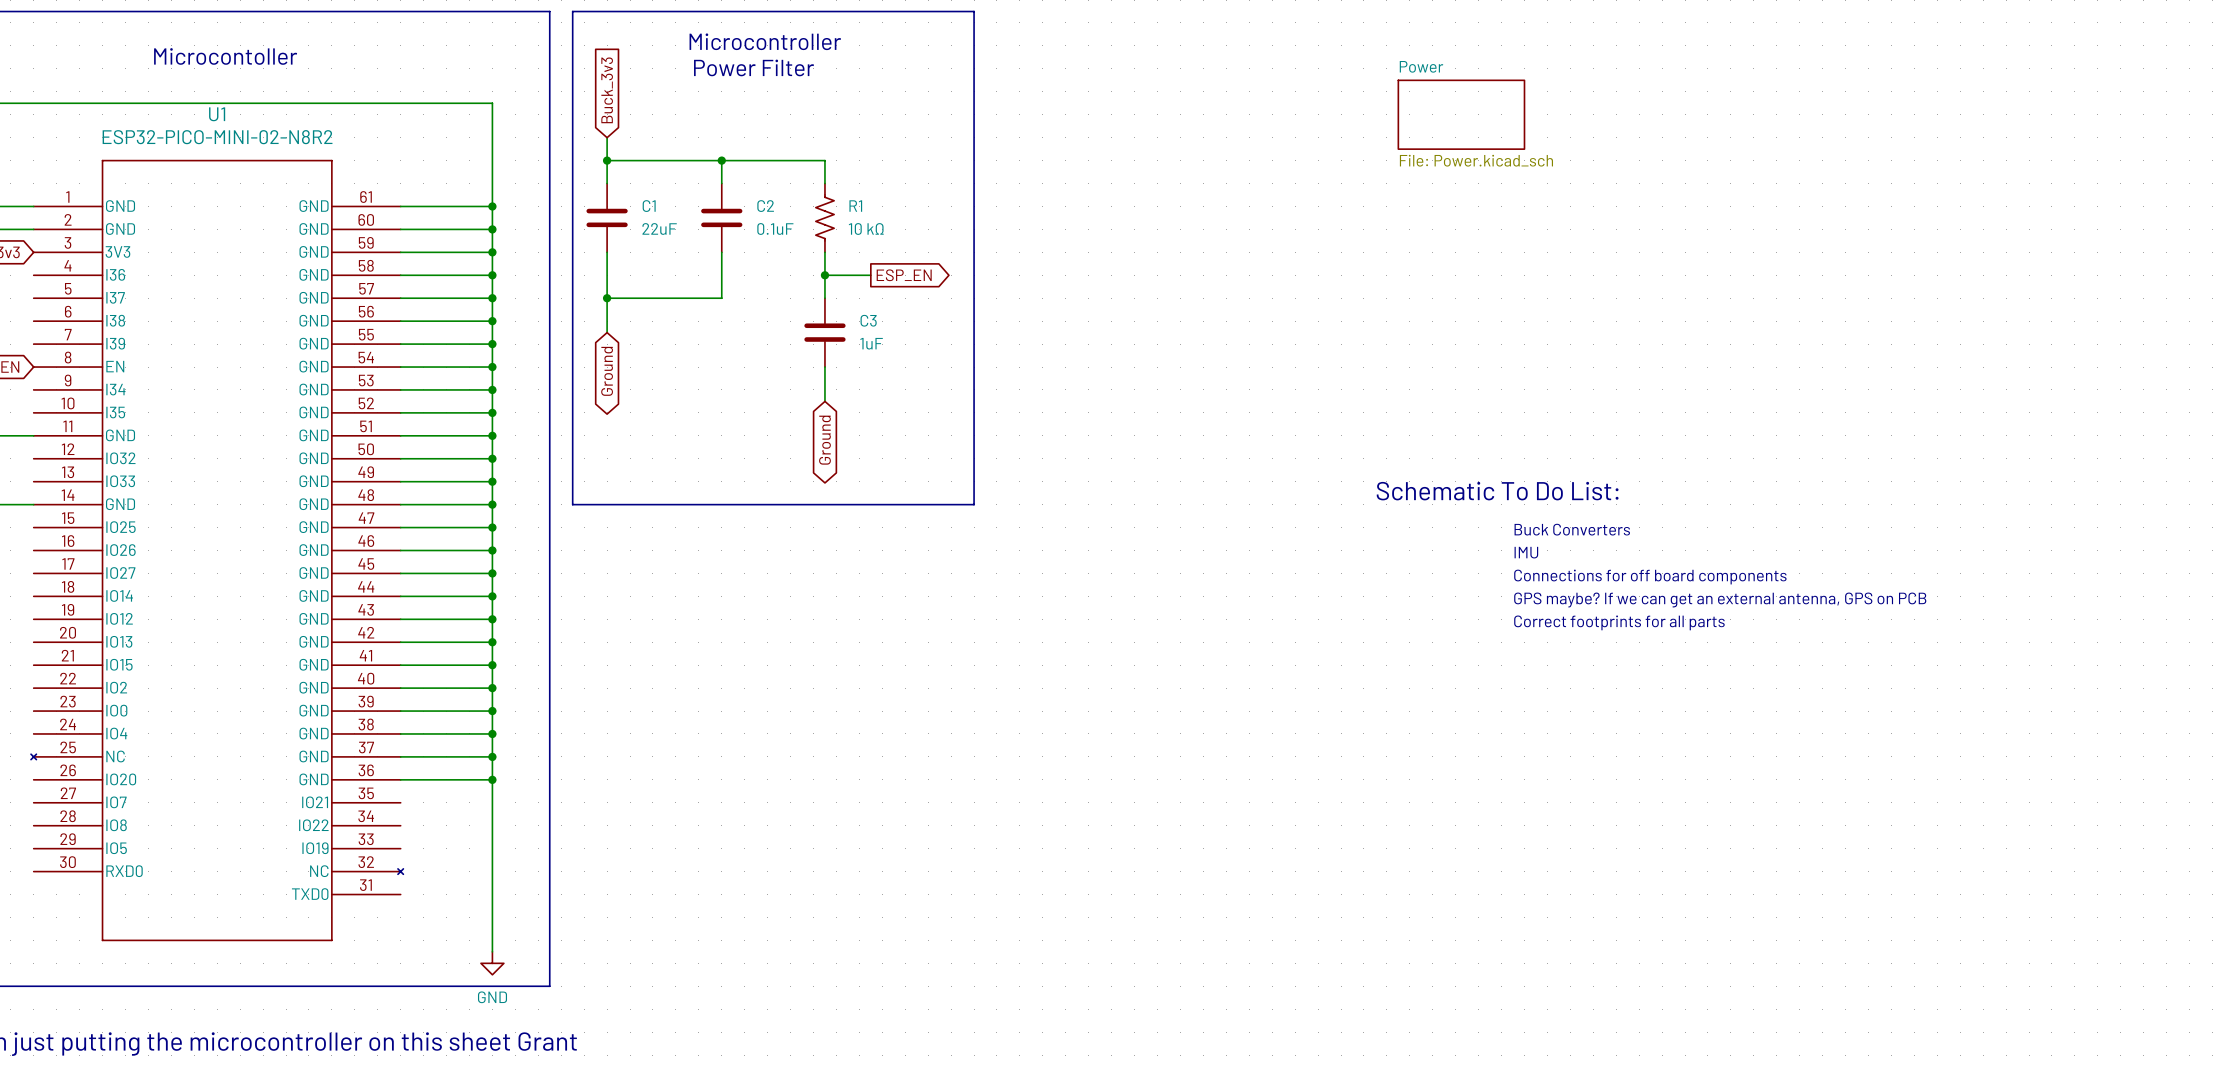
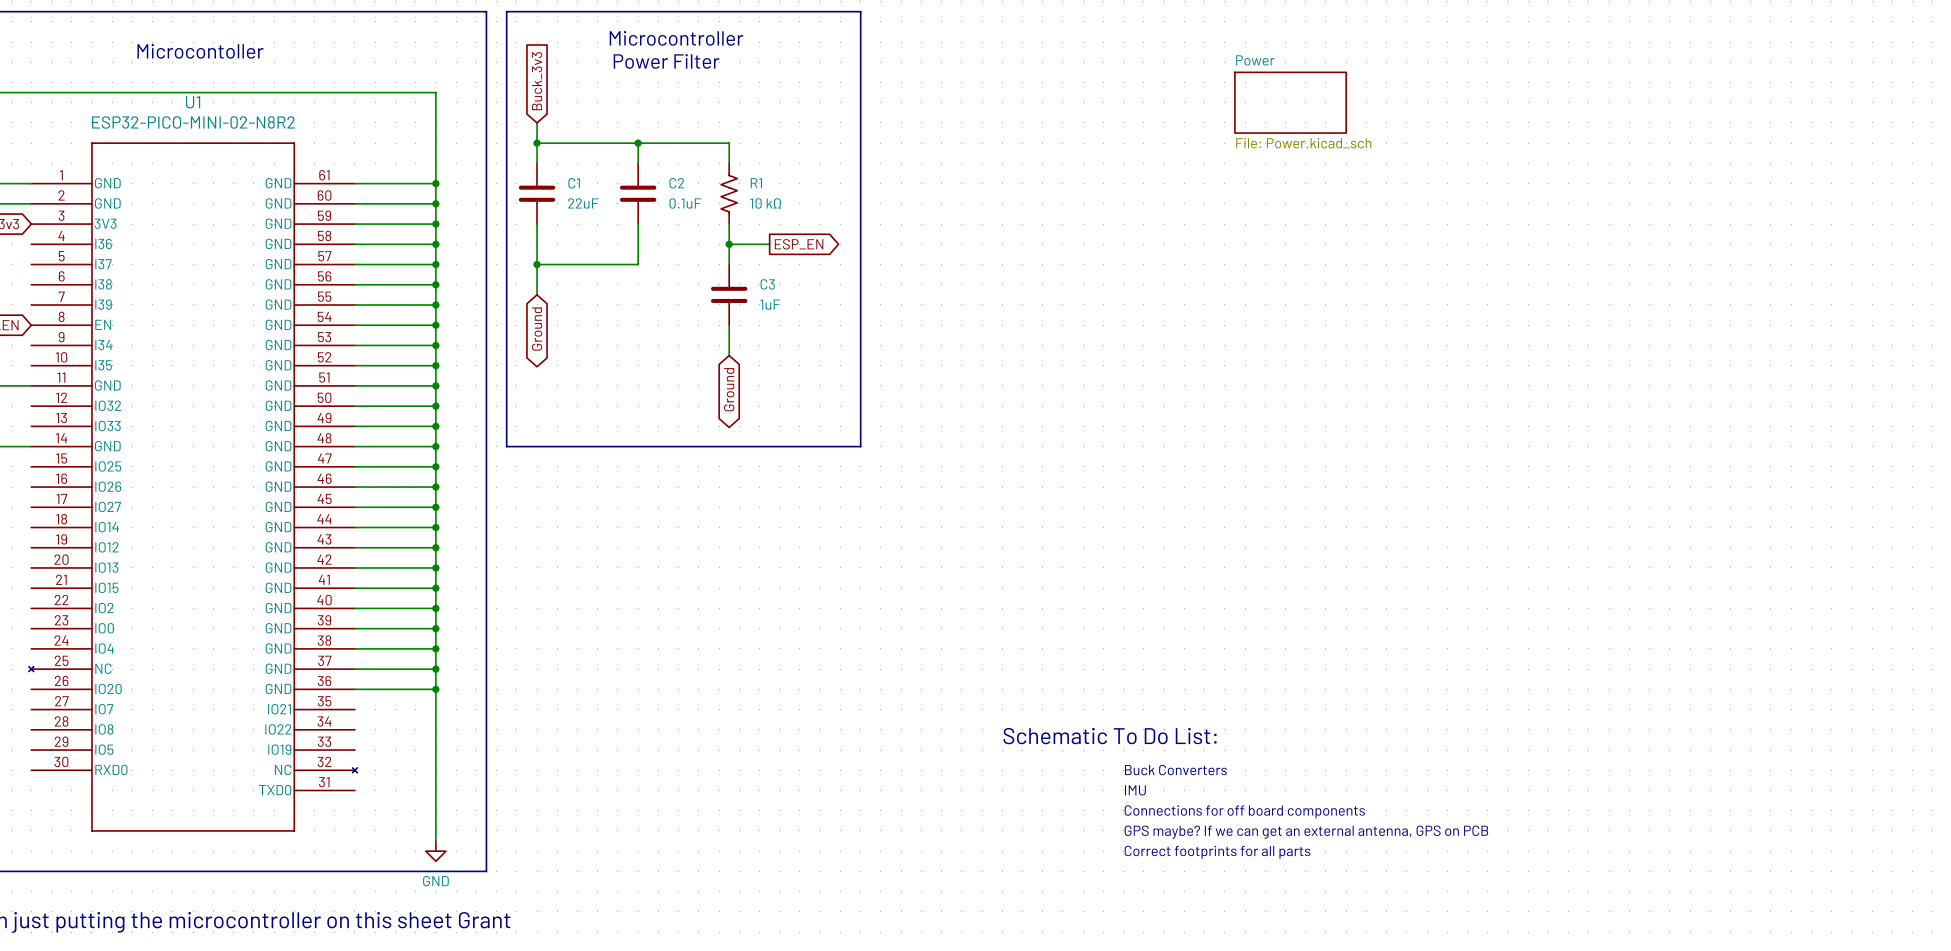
text: Schematic To Do List: (1497, 491) -> none
text: Buck Converters (1572, 529) -> none
text: IMU (1526, 552) -> none
text: Connections for off board components (1650, 577) -> none
text: GPS maybe? If we can get an external antenna, GPS on PCB (1720, 600) -> none
text: Correct footprints for all parts (1619, 622) -> none
text: none -> Schematic To Do List: (1110, 736)
text: none -> Buck Converters (1175, 770)
text: none -> IMU (1135, 790)
text: none -> Connections for off board components (1244, 811)
text: none -> GPS maybe? If we can get an external antenna, GPS on PCB (1306, 832)
text: none -> Correct footprints for all parts (1217, 852)

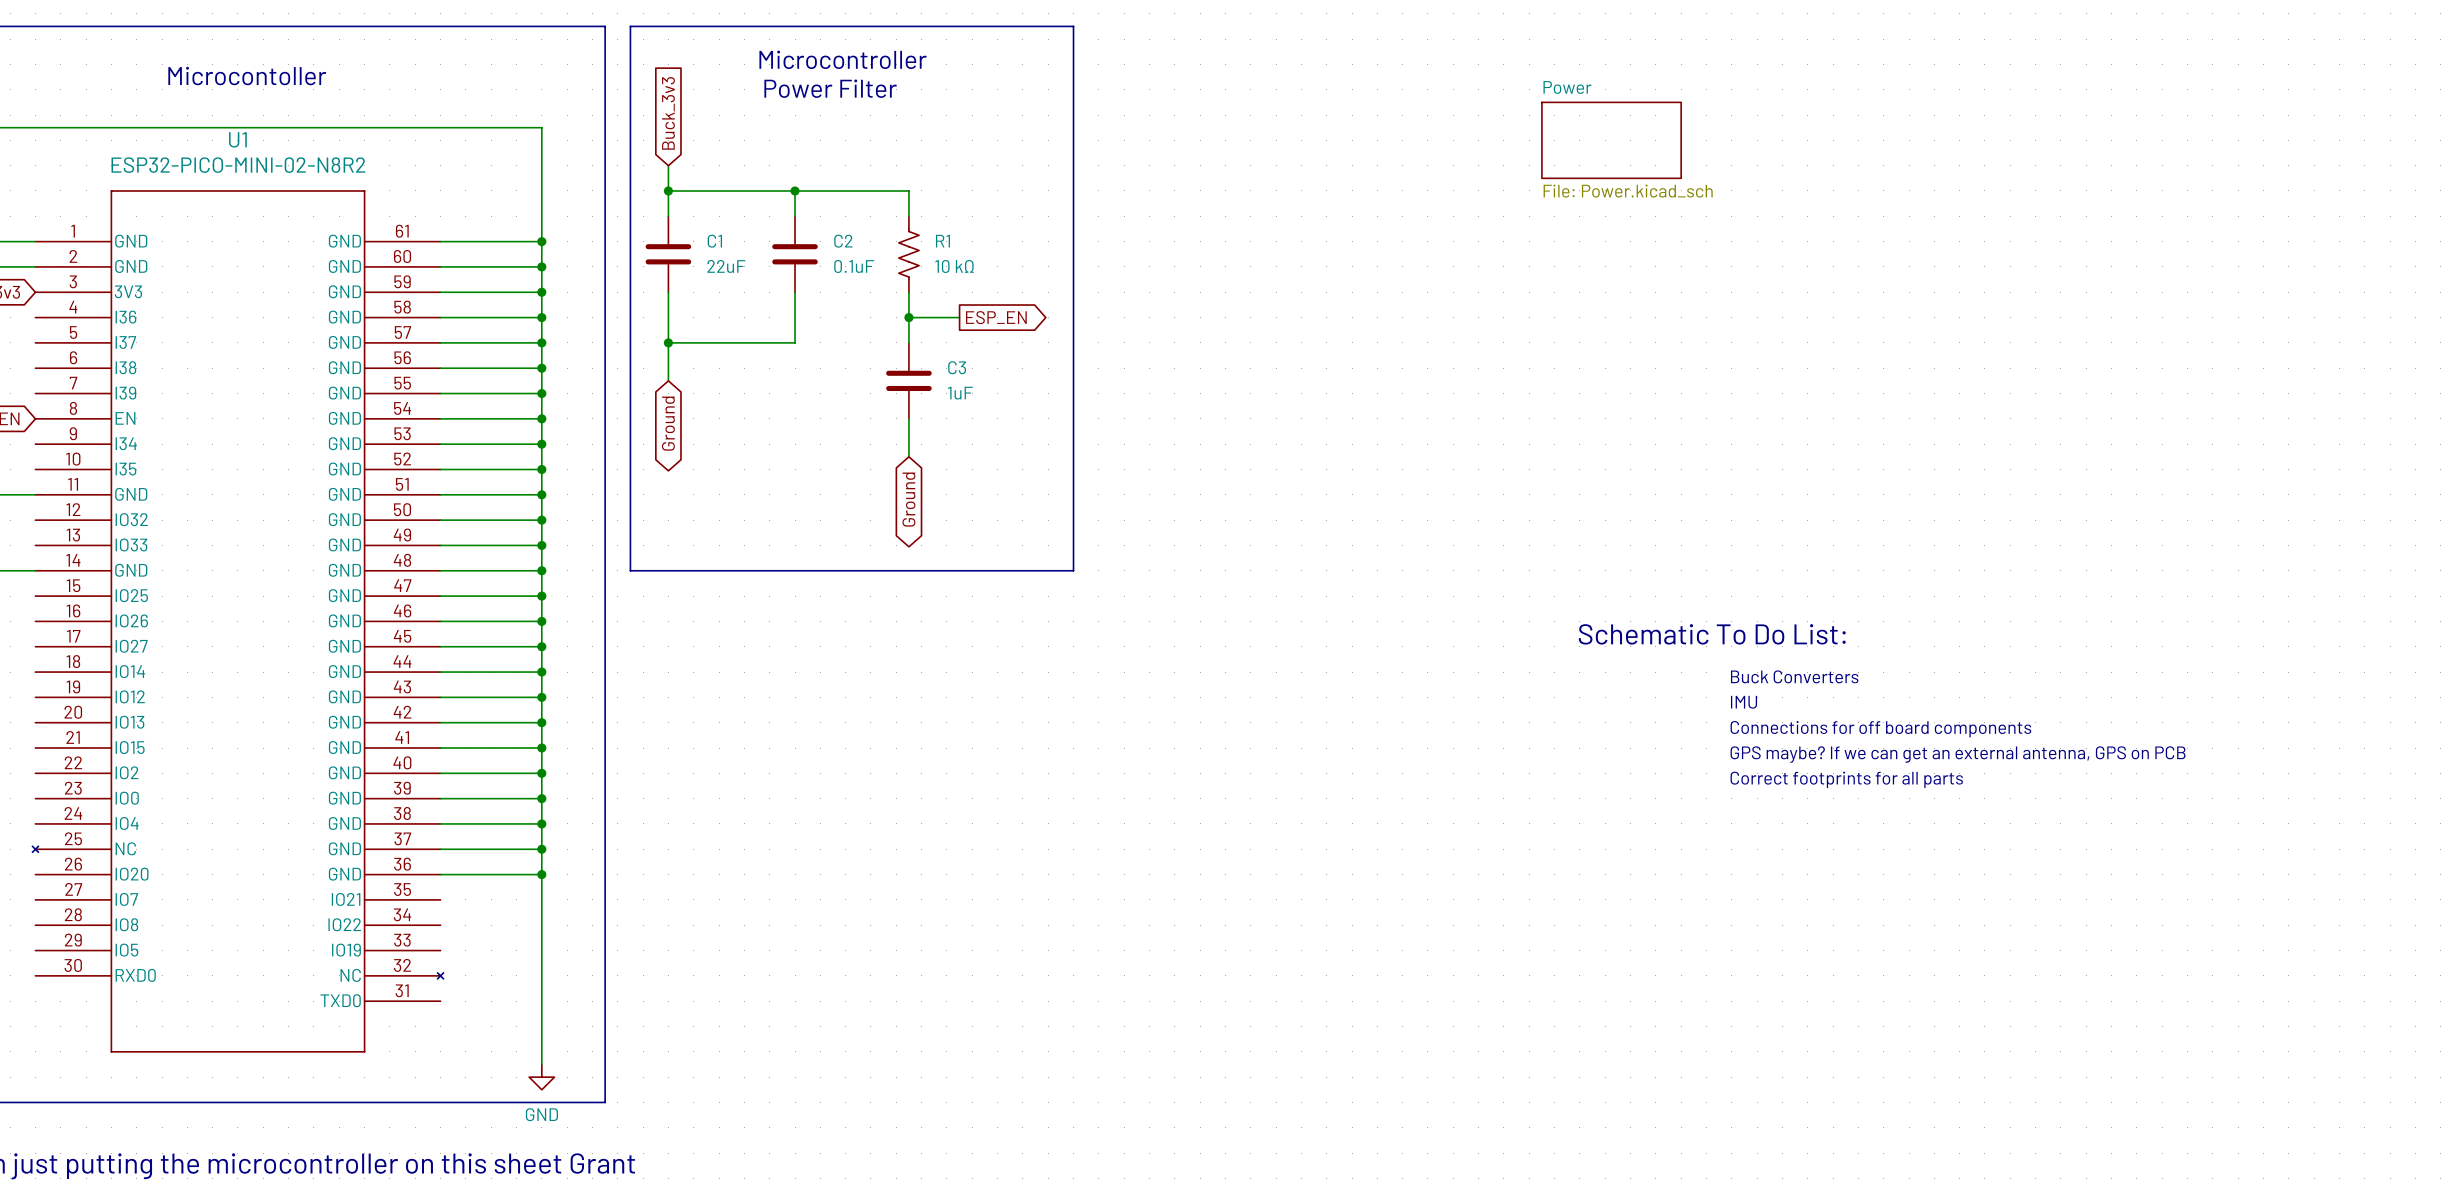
text: none -> Schematic To Do List: (1712, 634)
text: none -> Buck Converters (1794, 676)
text: none -> IMU (1744, 702)
text: none -> Connections for off board components (1880, 729)
text: none -> GPS maybe? If we can get an external antenna, GPS on PCB (1958, 754)
text: none -> Correct footprints for all parts (1846, 779)
text: Schematic To Do List: (1110, 736) -> none
text: Buck Converters (1175, 770) -> none
text: IMU (1135, 790) -> none
text: Connections for off board components (1244, 811) -> none
text: GPS maybe? If we can get an external antenna, GPS on PCB (1306, 832) -> none
text: Correct footprints for all parts (1217, 852) -> none

